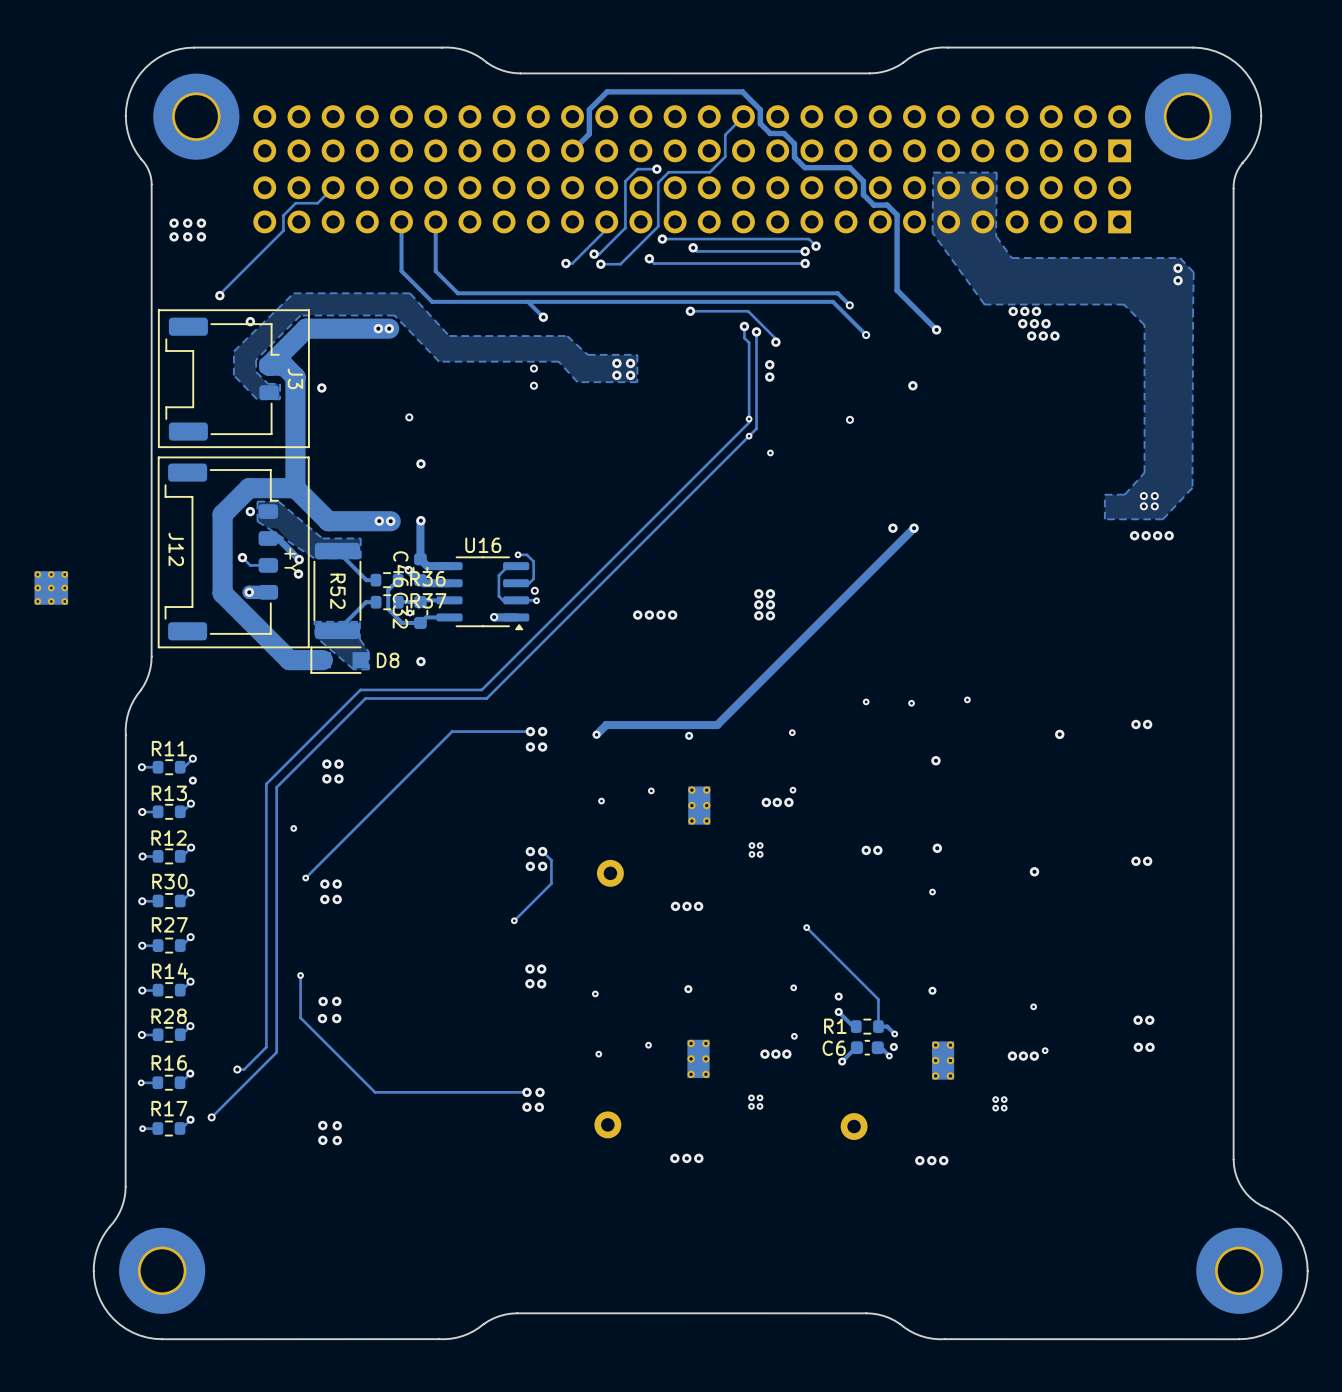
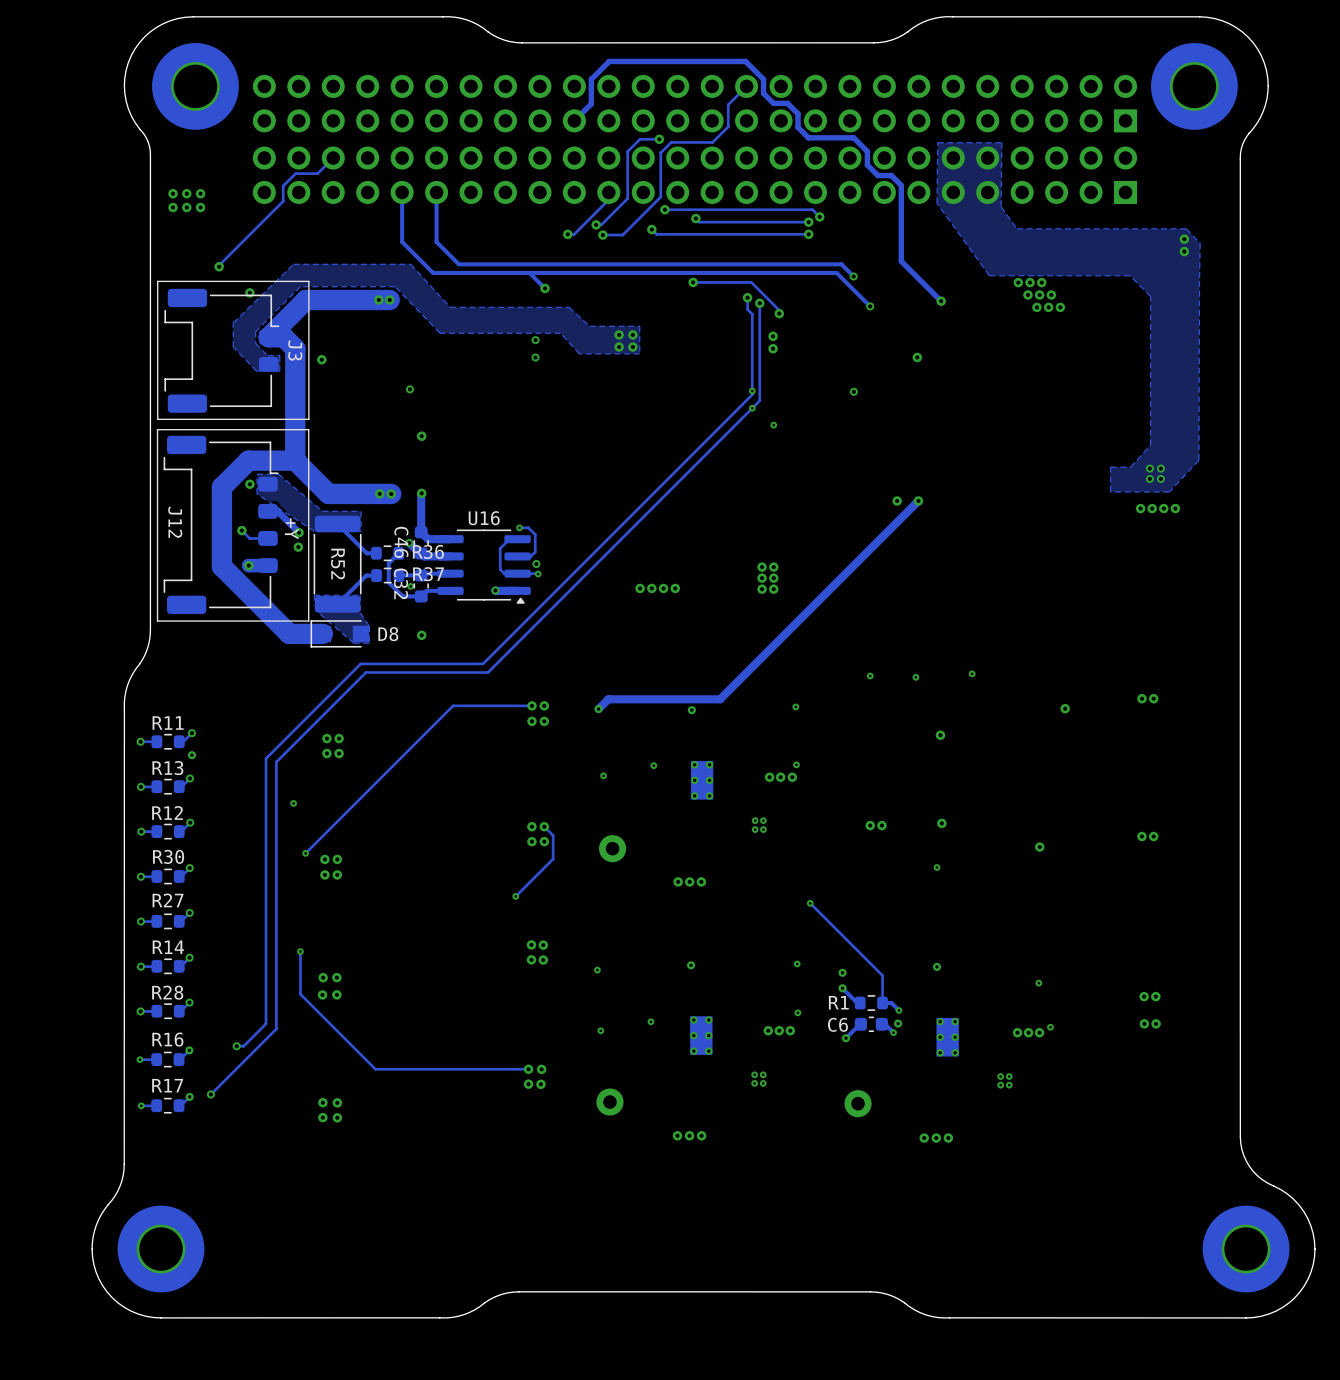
part: (51, 587) -> none

